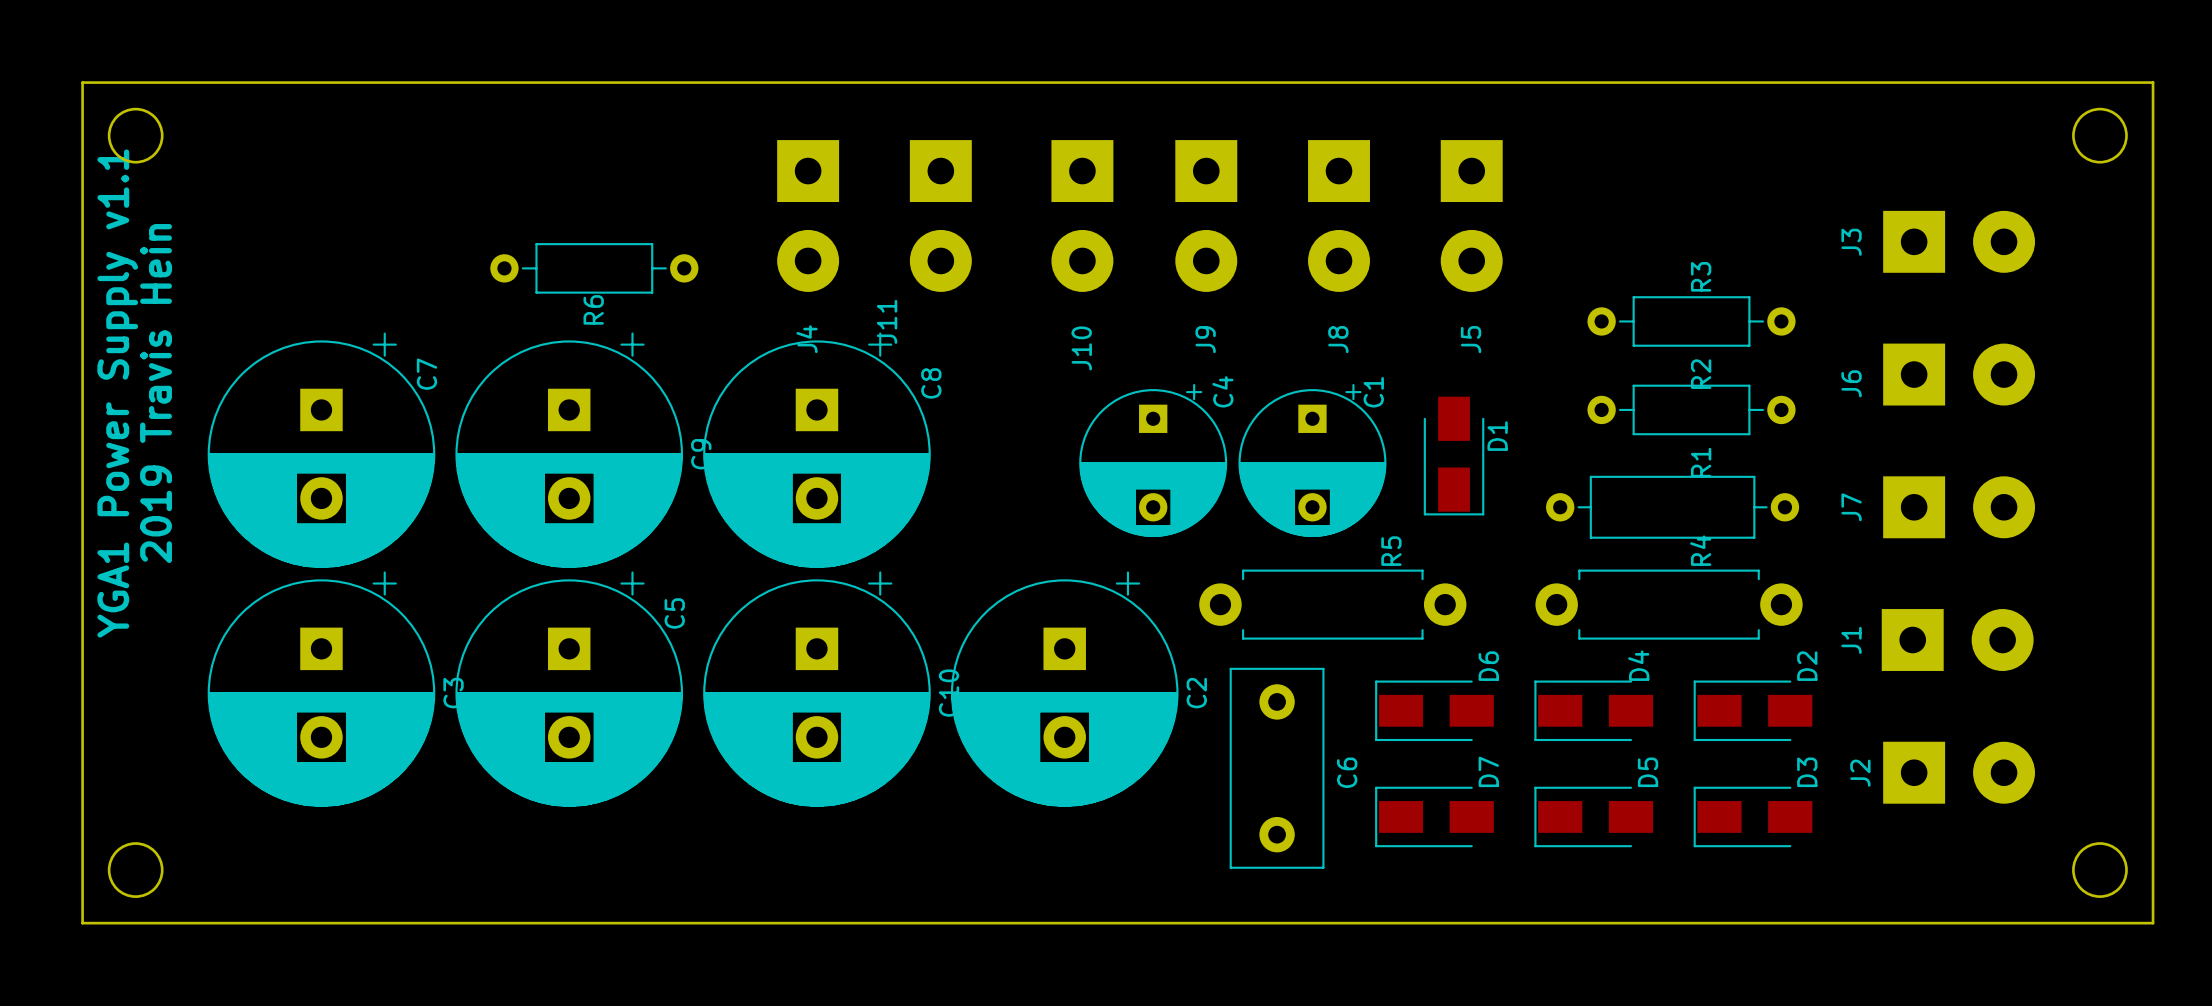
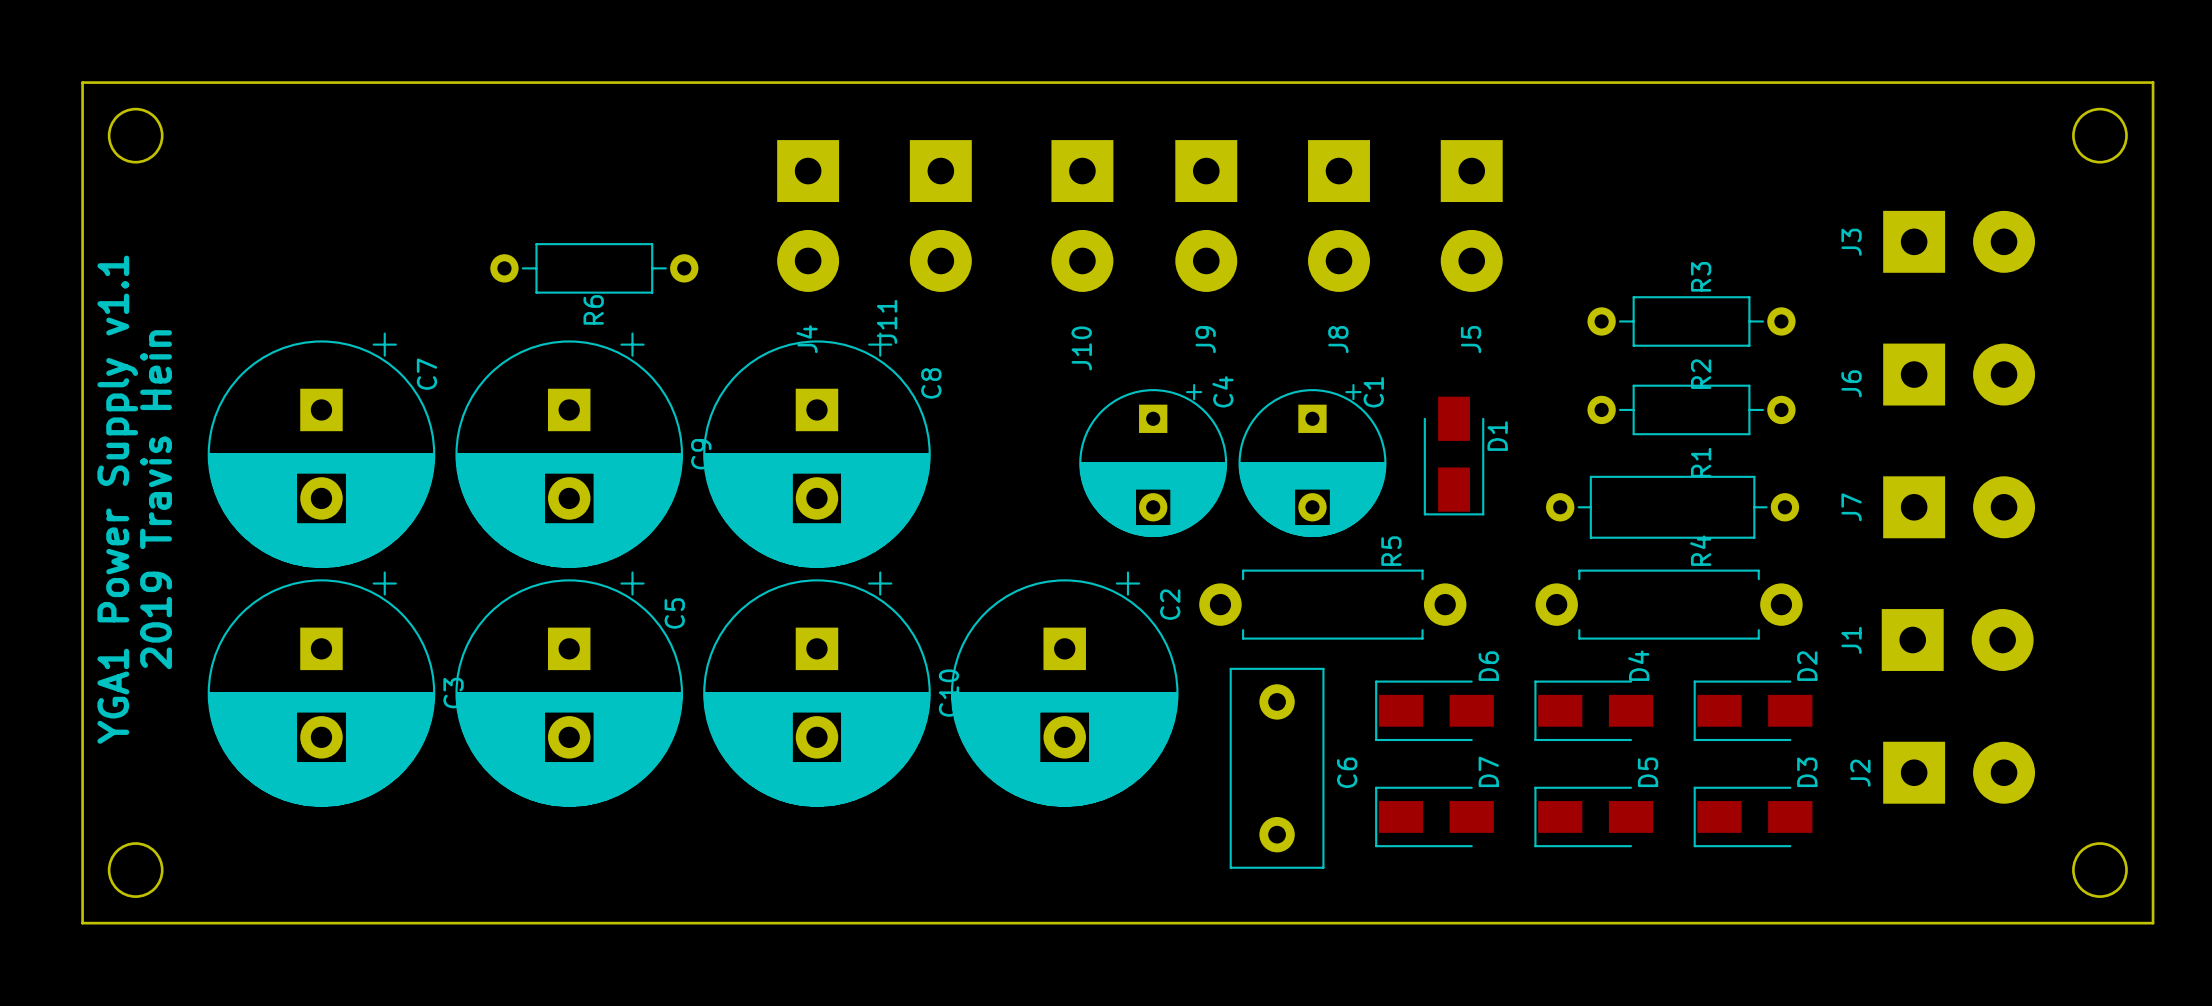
text position: YGA1 Power Supply v1.1 (117, 393) -> YGA1 Power Supply v1.1 (117, 499)
text position: 2019 Travis Hein (156, 393) -> 2019 Travis Hein (156, 499)
C2 name position: C2 (1196, 693) -> C2 (1170, 604)

